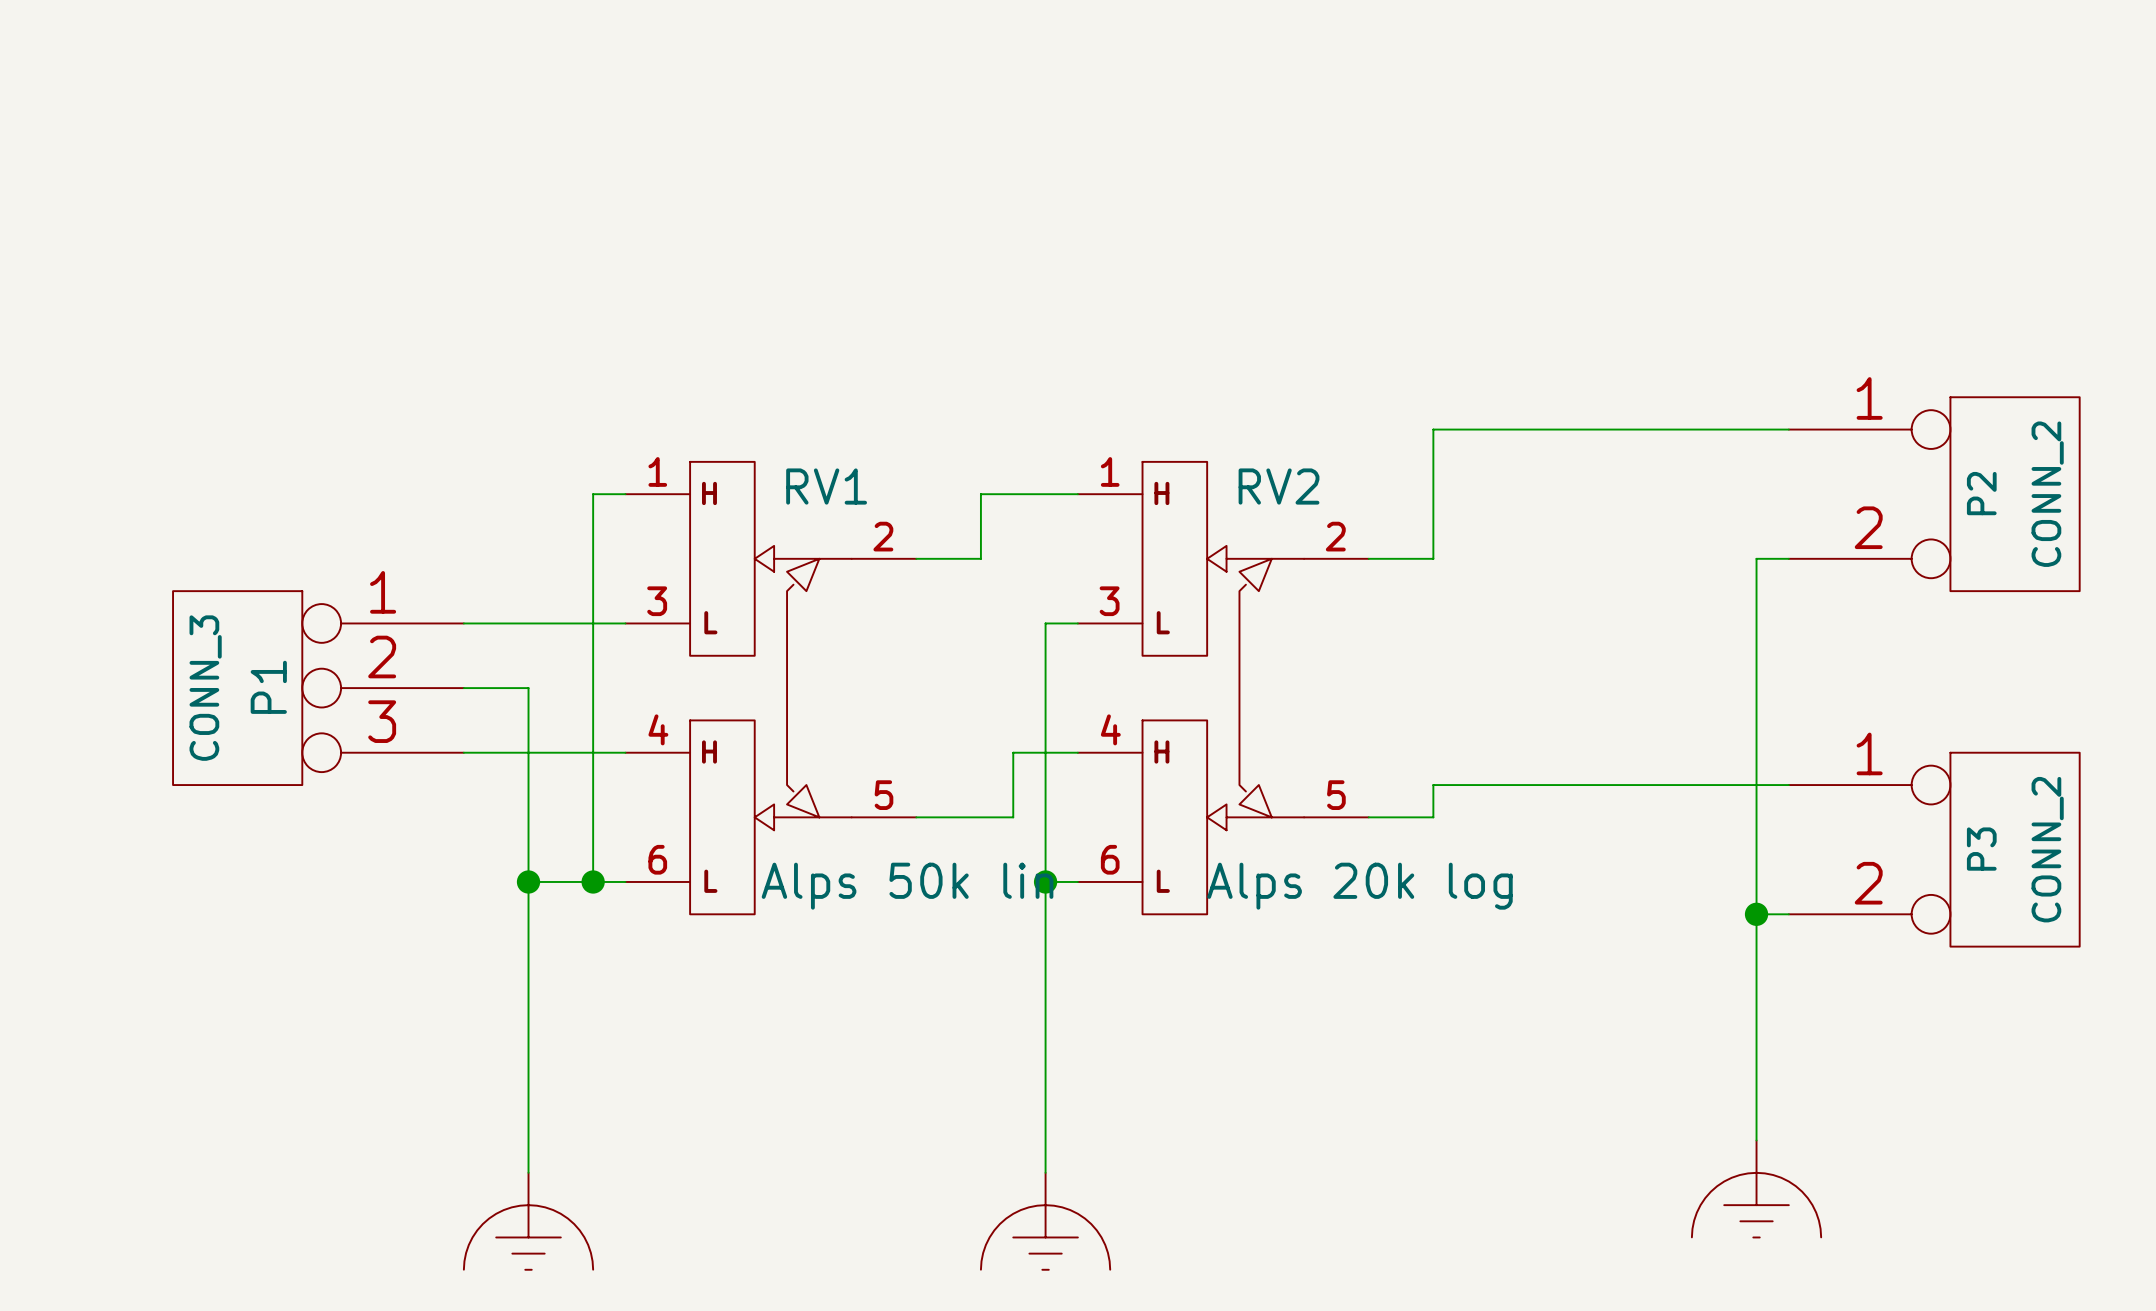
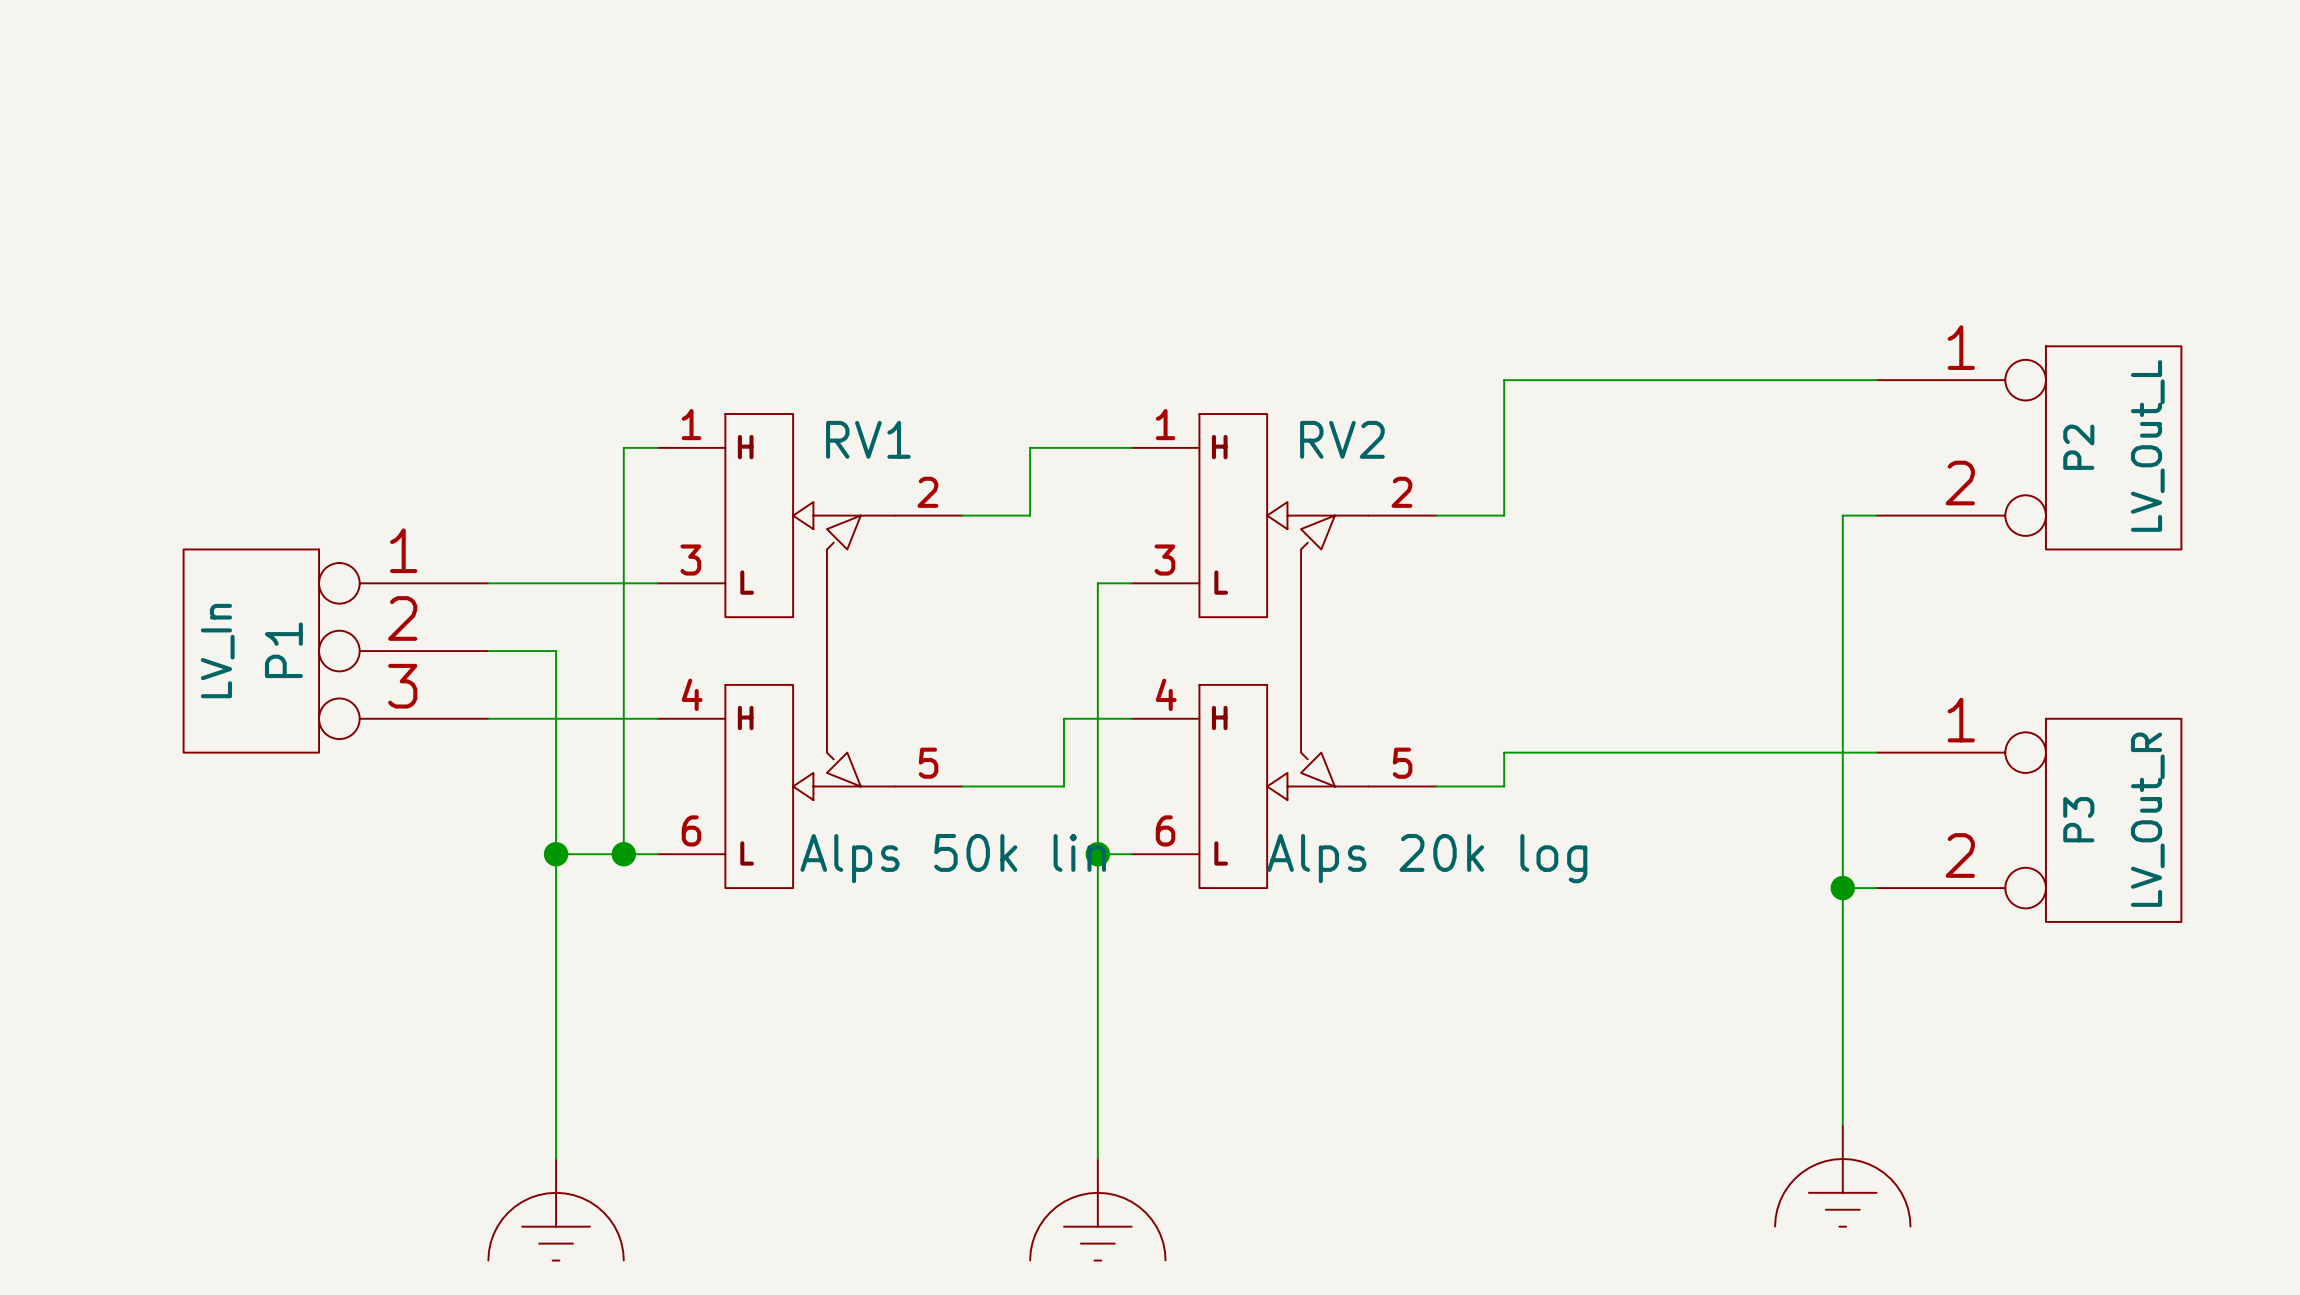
P2 value: CONN_2 (2047, 494) -> LV_Out_L (2147, 445)
P1 value: CONN_3 (205, 688) -> LV_In (217, 651)
P3 value: CONN_2 (2047, 849) -> LV_Out_R (2147, 819)

